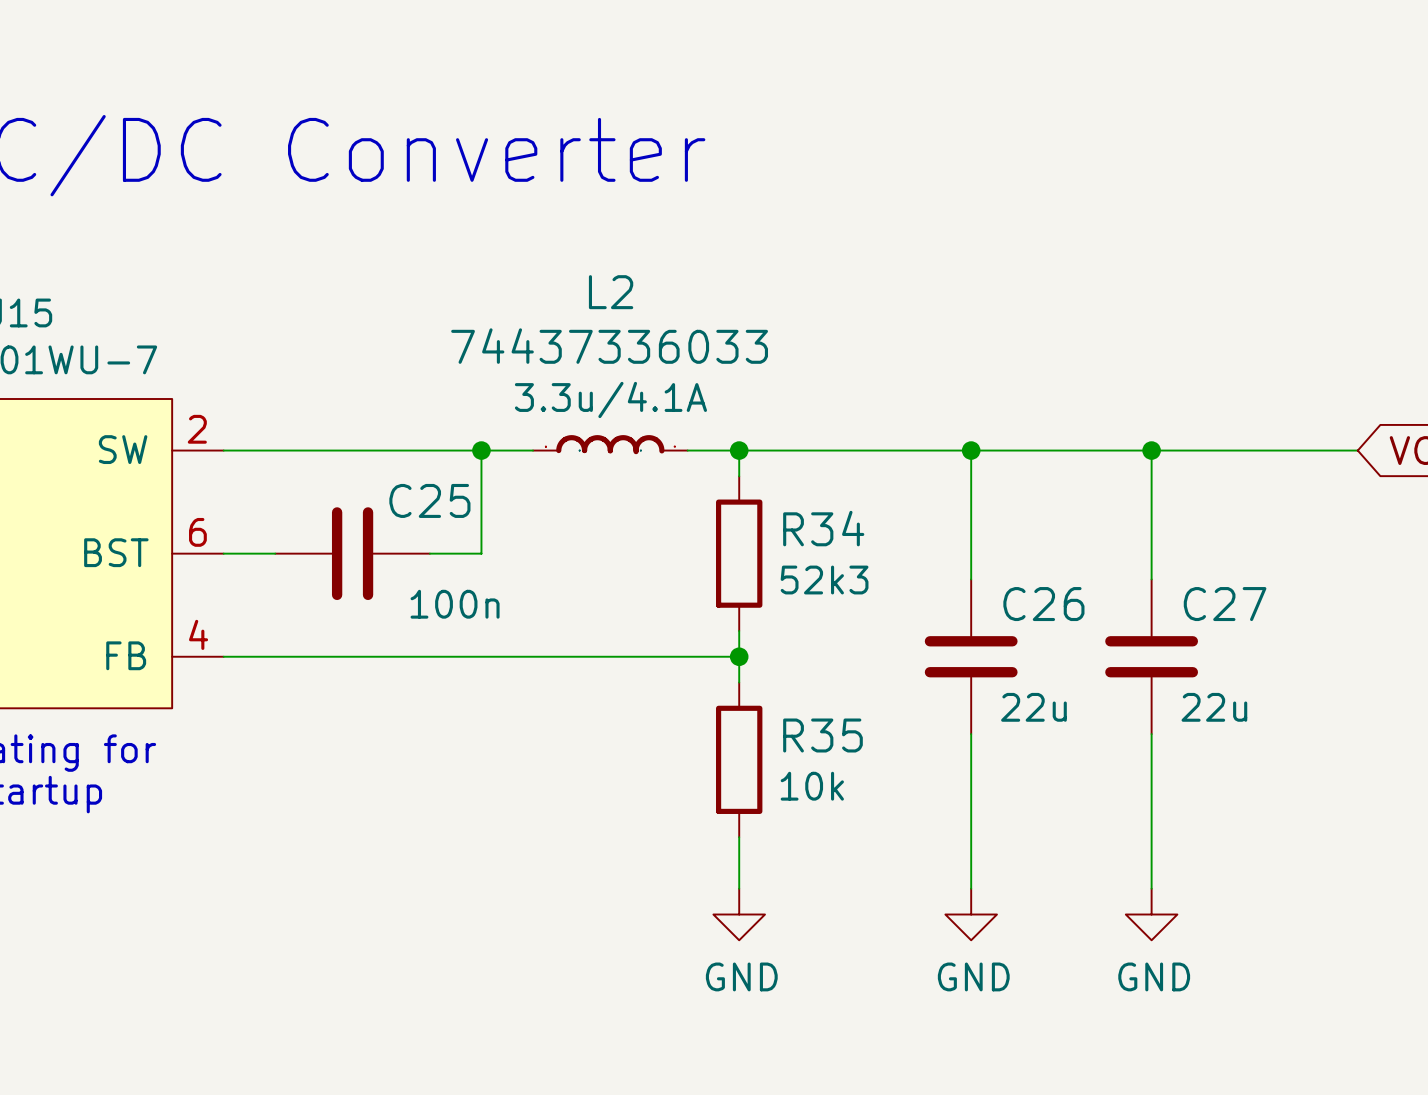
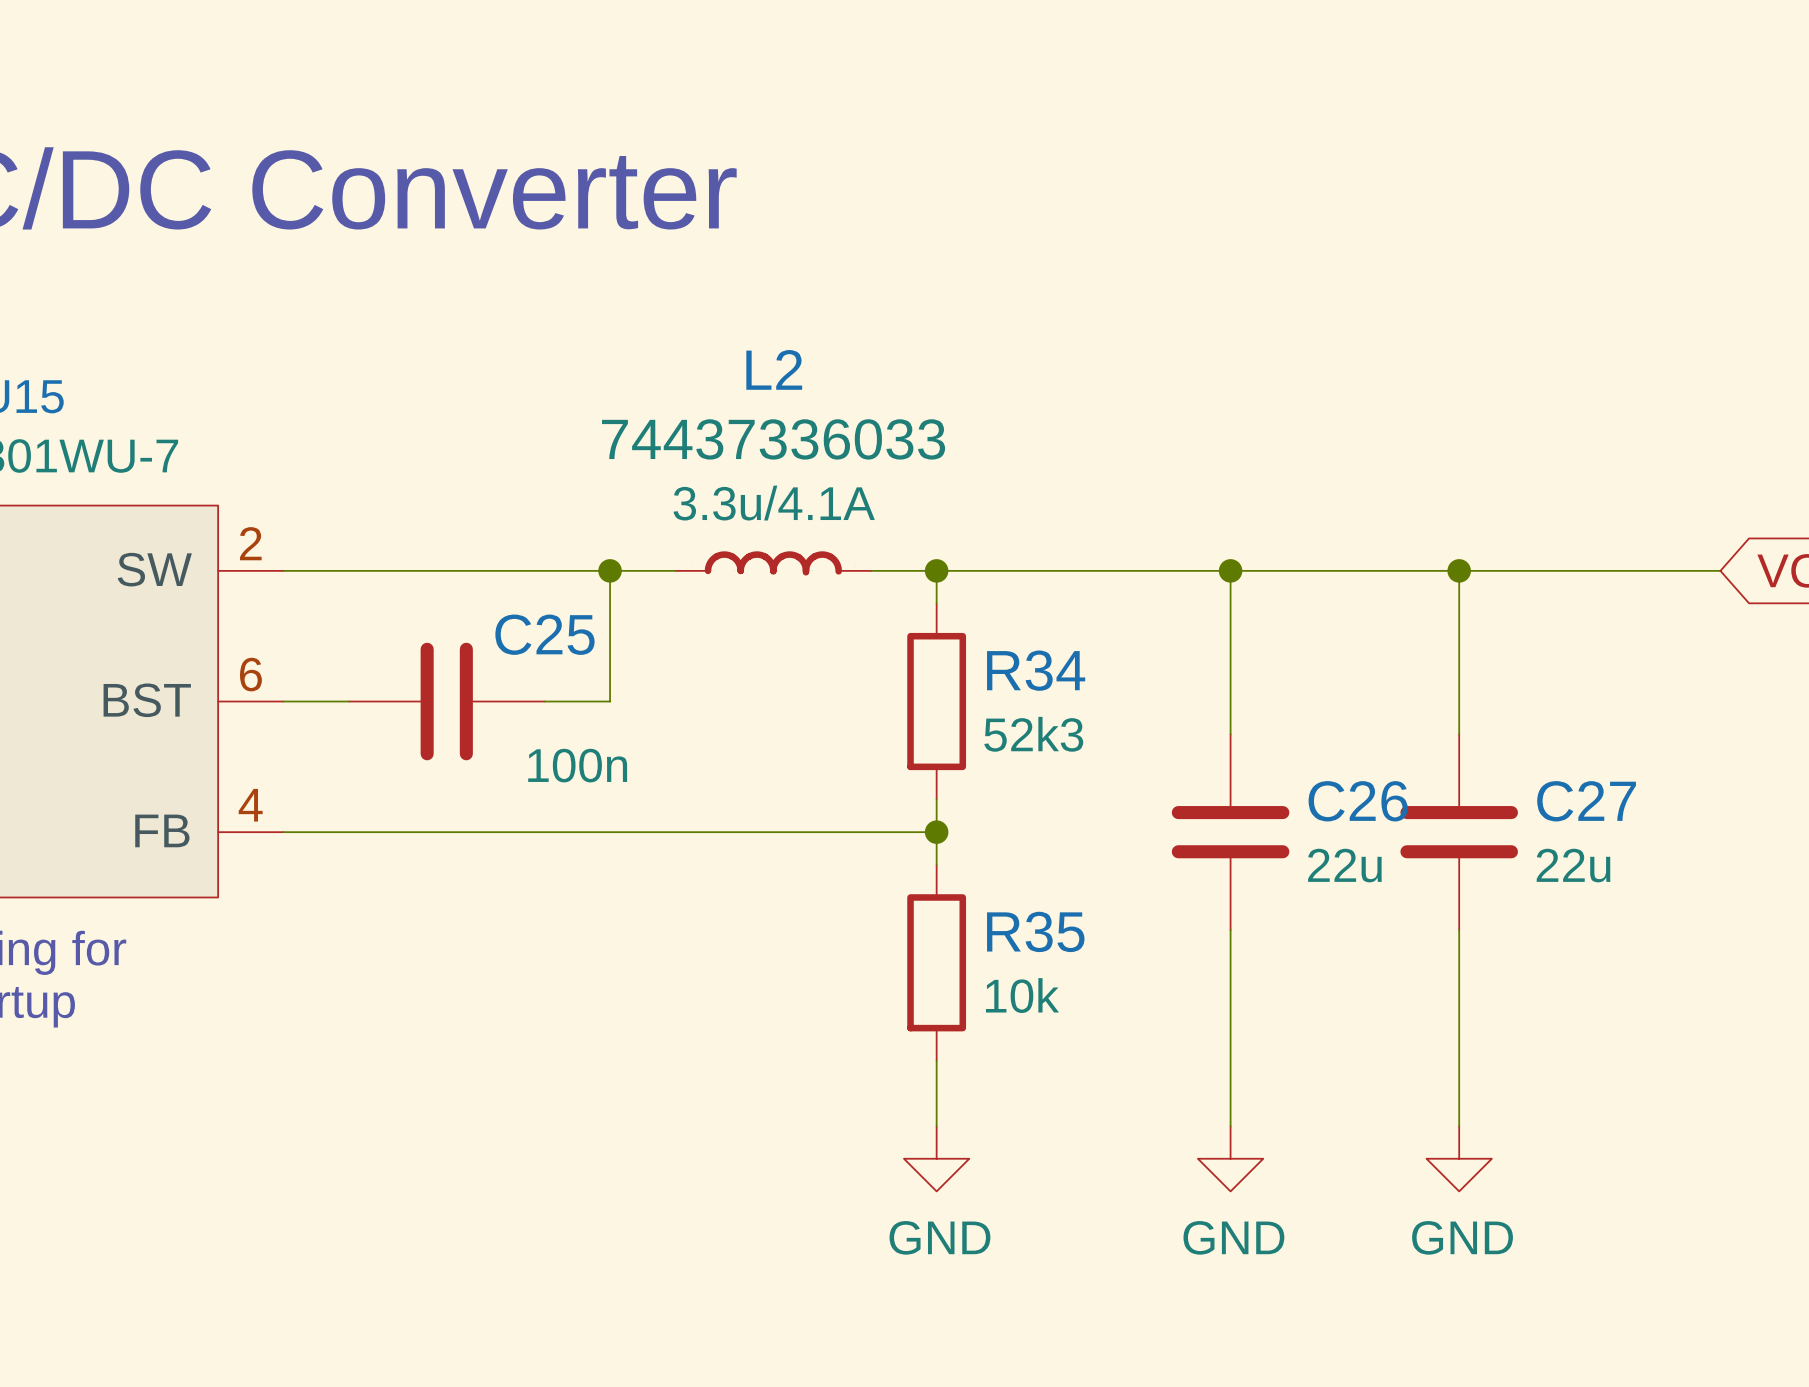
C26 name position: C26 (1043, 604) -> C26 (1358, 801)
C27 name position: C27 (1225, 604) -> C27 (1586, 801)
C26 text position: 22u (1033, 707) -> 22u (1344, 865)
C27 text position: 22u (1214, 707) -> 22u (1573, 865)

